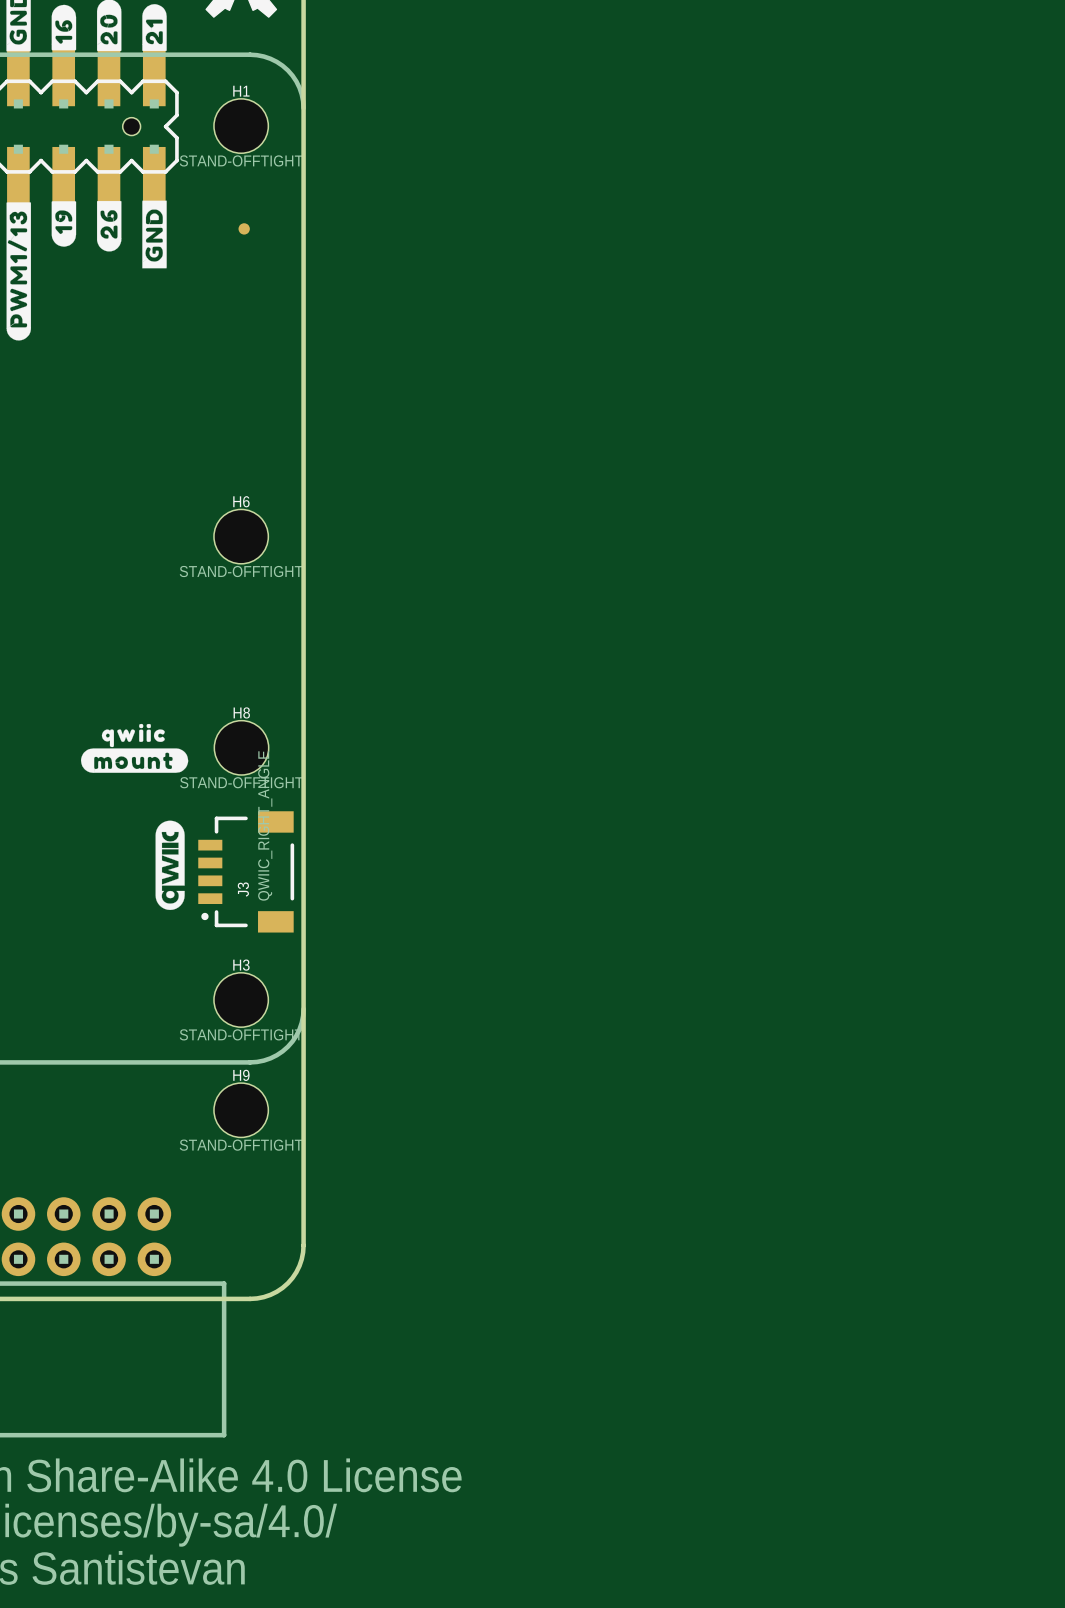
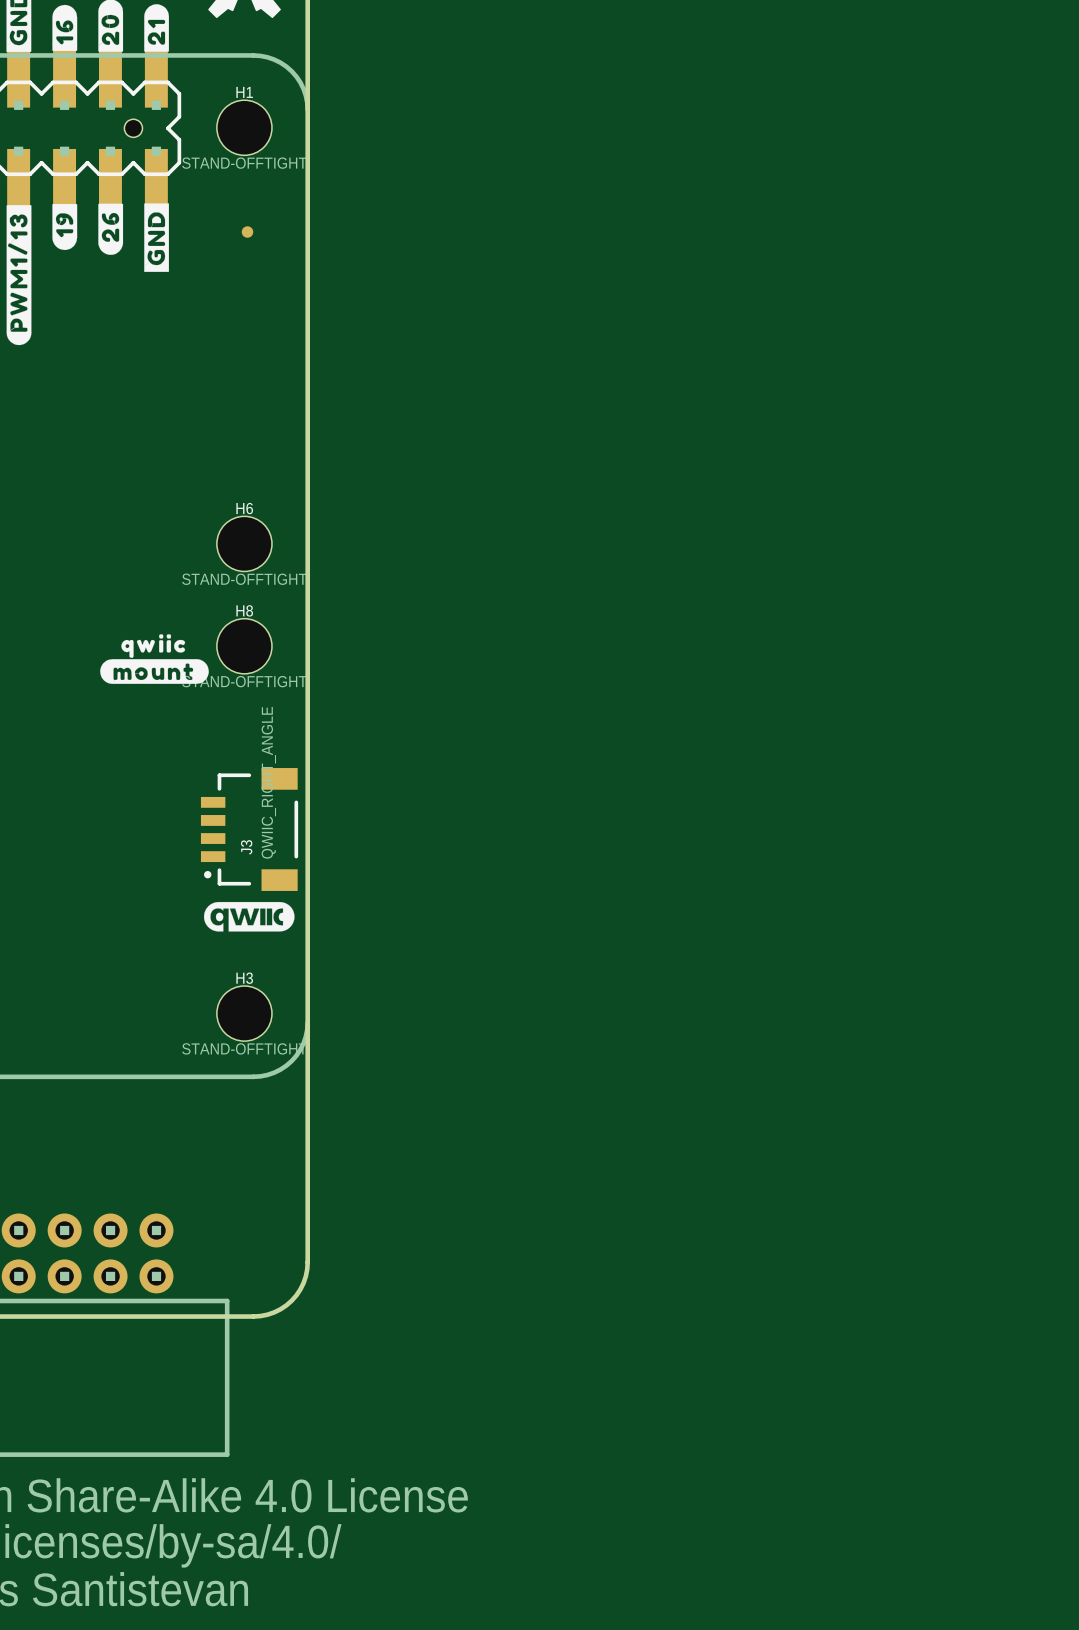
drawing position: (133, 735) -> (153, 646)
H8 position: (241, 747) -> (244, 646)
drawing position: (134, 760) -> (154, 671)
drawing: [155, 820, 185, 911] -> none
J3 position: (246, 871) -> (249, 829)
drawing: none -> [203, 901, 295, 932]
H9: STAND-OFFTIGHT (241, 1110) -> none

